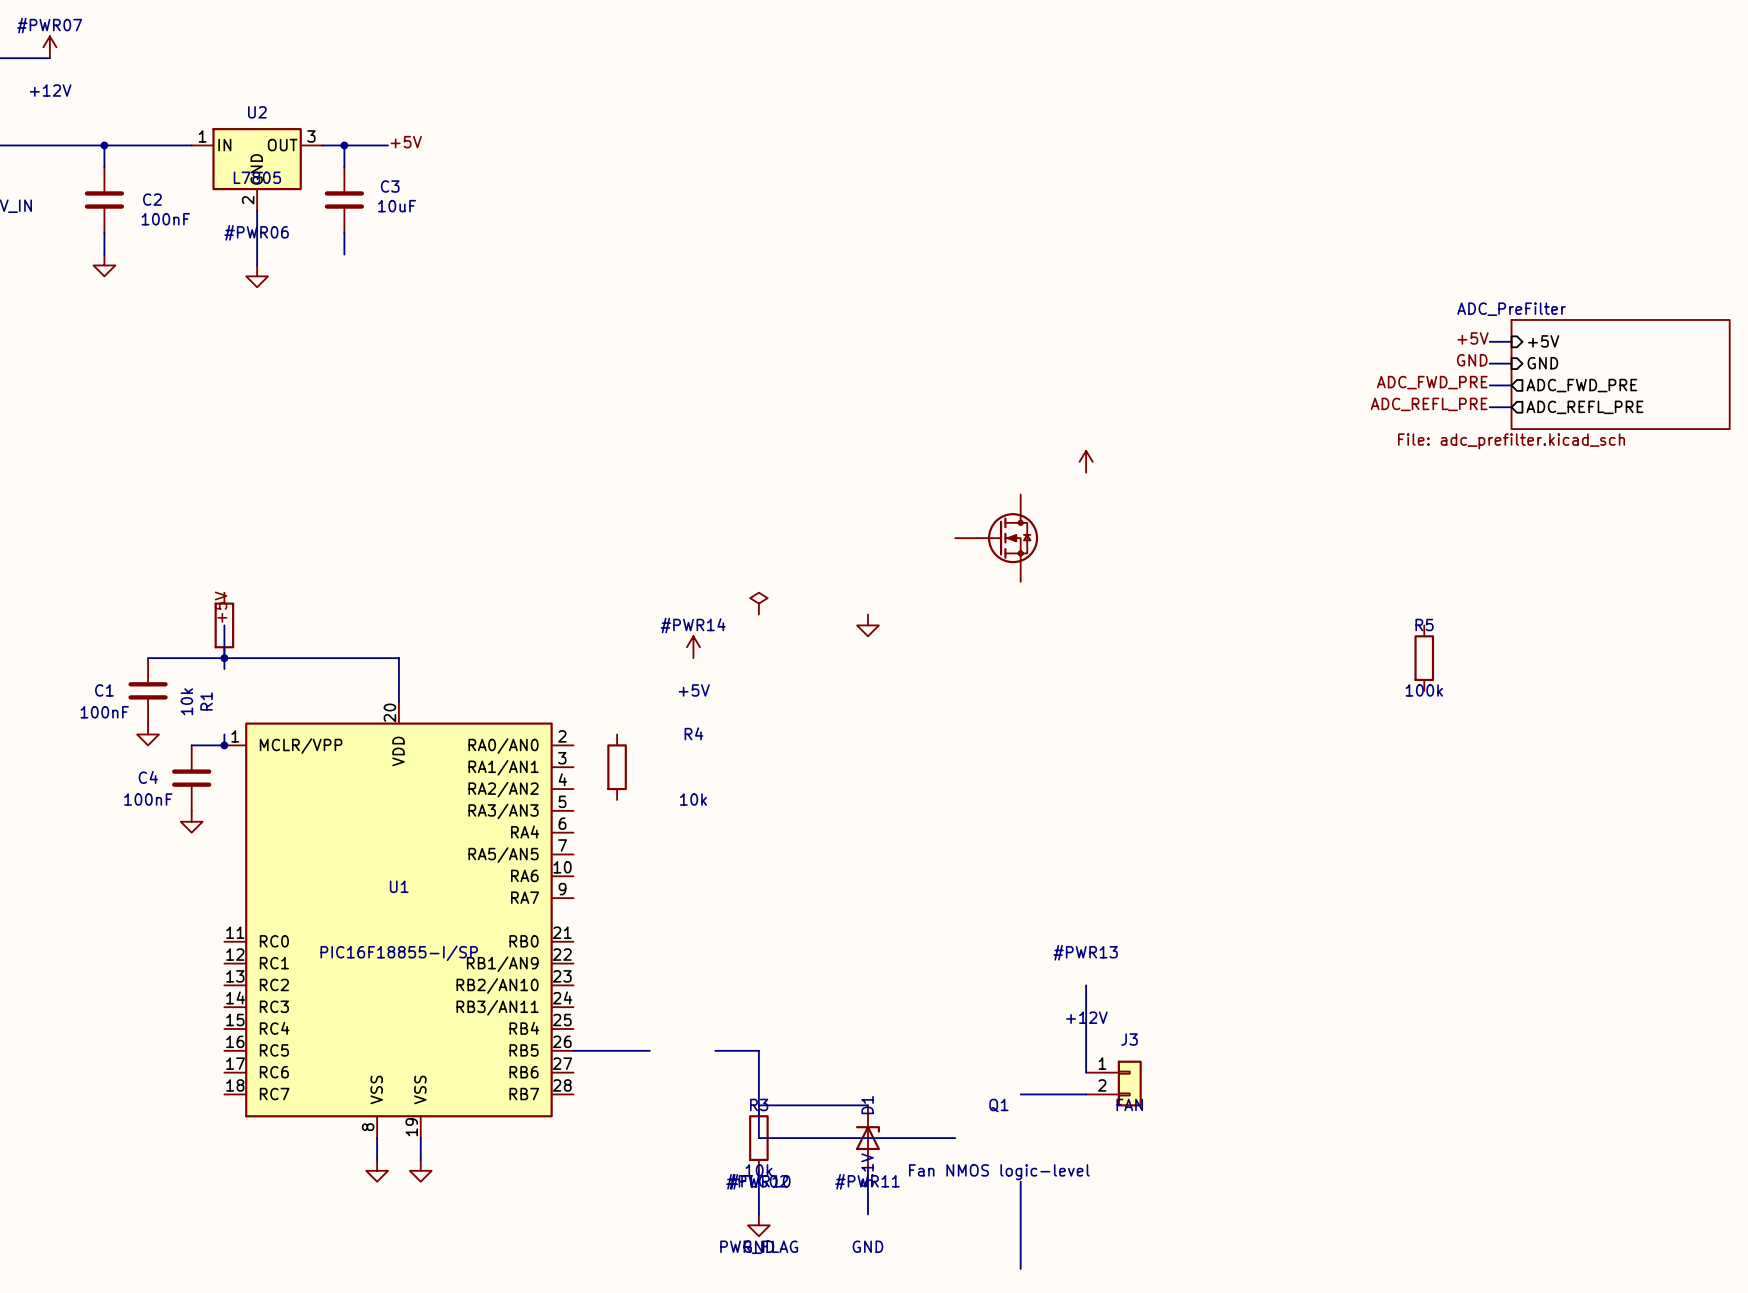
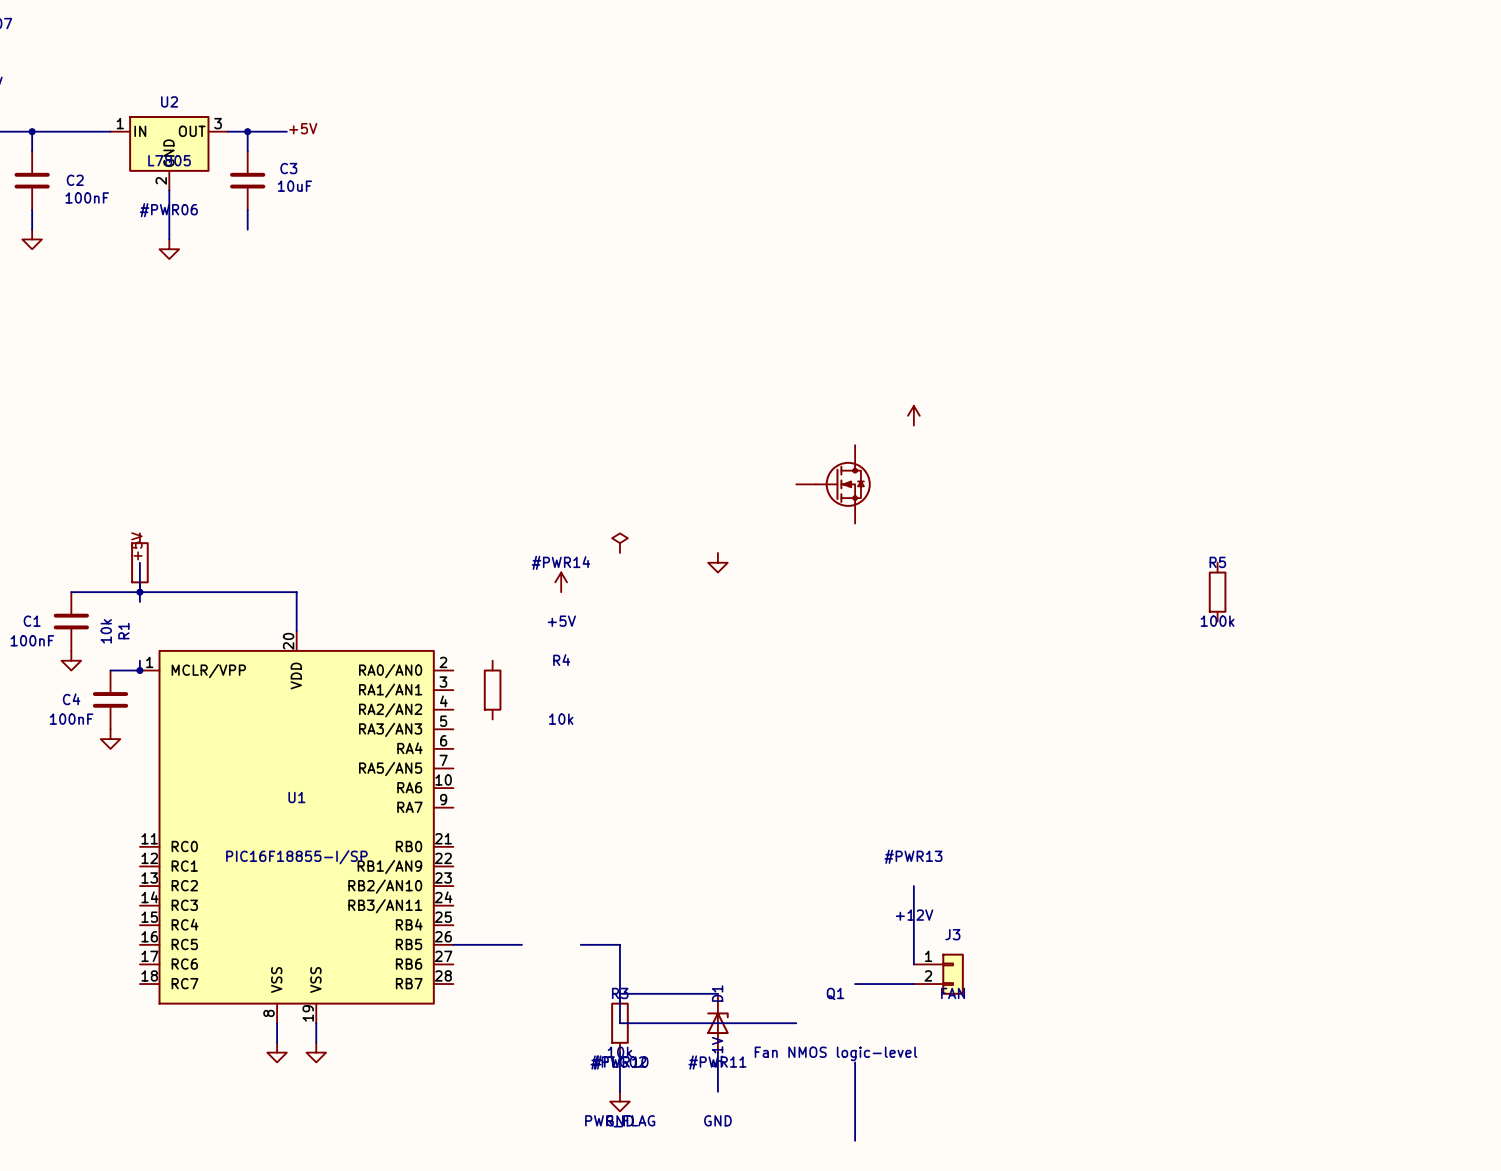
label: +5V (1473, 338) -> none
wire: (1489, 341) (1511, 341) -> none
sheet pin: +5V (1543, 341) -> none
label: GND (1472, 360) -> none
wire: (1489, 363) (1511, 363) -> none
sheet pin: GND (1542, 363) -> none
sheet ADC_PreFilter: File: adc_prefilter.kicad_sch (1620, 374) -> none
label: ADC_FWD_PRE (1432, 382) -> none
wire: (1489, 385) (1511, 385) -> none
sheet pin: ADC_FWD_PRE (1581, 385) -> none
label: ADC_REFL_PRE (1429, 404) -> none
wire: (1489, 407) (1511, 407) -> none
sheet pin: ADC_REFL_PRE (1584, 407) -> none

